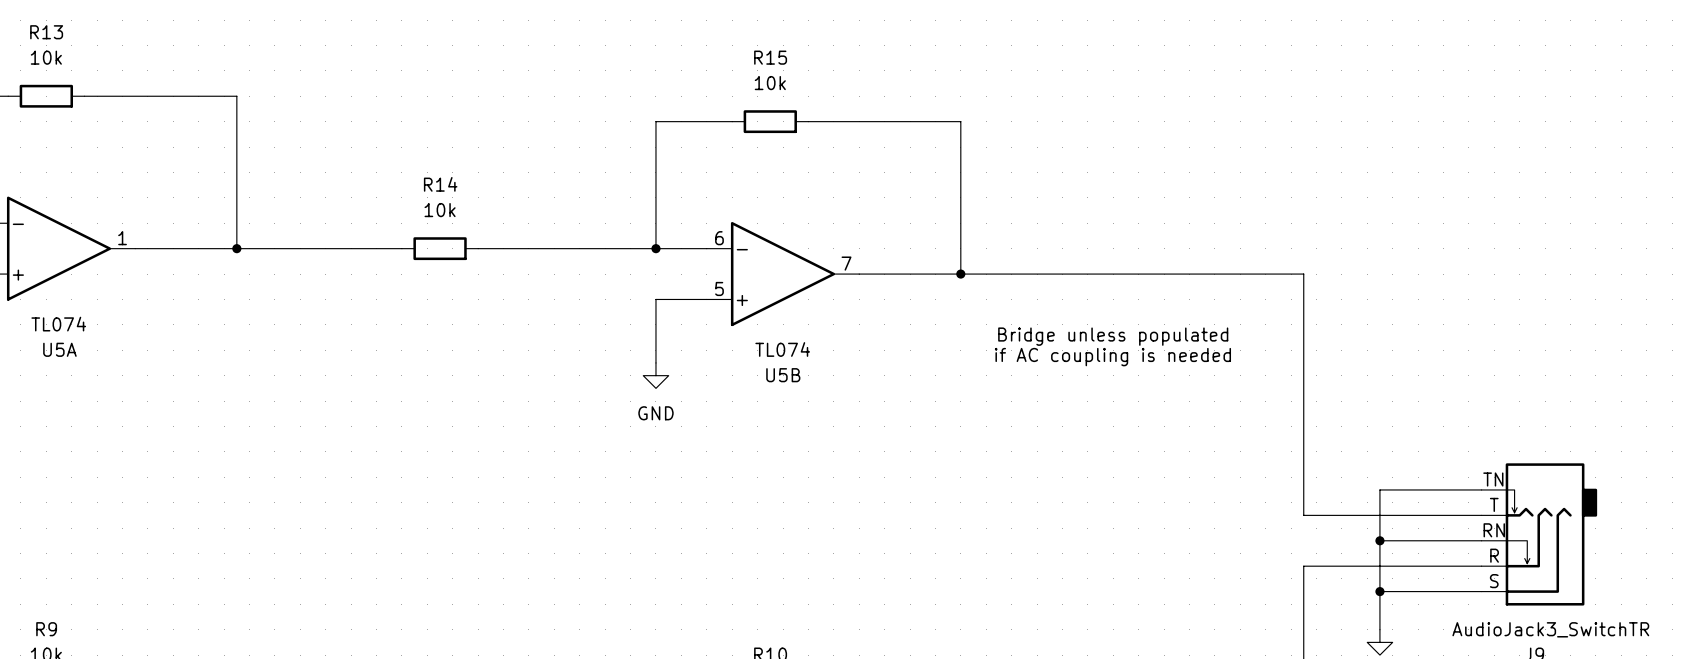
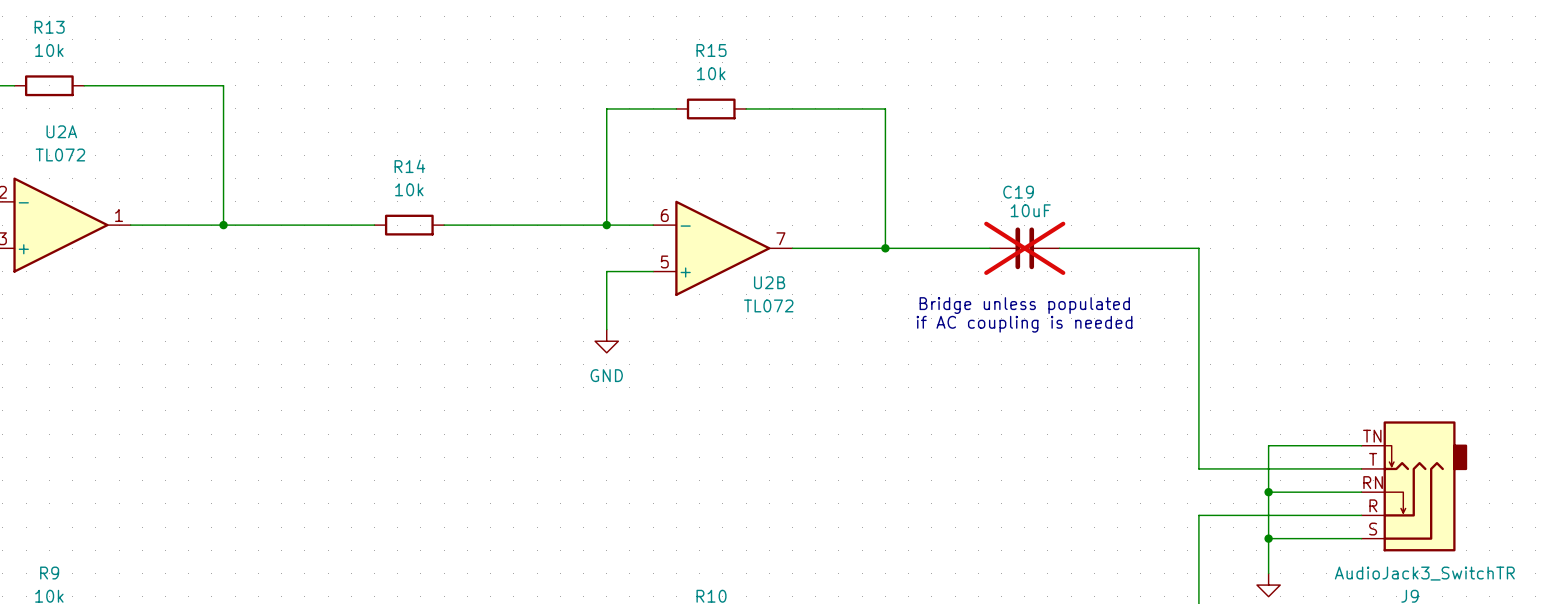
C19: none -> 10uF (1024, 248)
U5A value: TL074 (58, 324) -> TL072 (60, 155)
U5A name: U5A (59, 349) -> U2A (61, 131)
U5B value: TL074 (782, 349) -> TL072 (768, 305)
U5B name: U5B (783, 375) -> U2B (769, 282)

